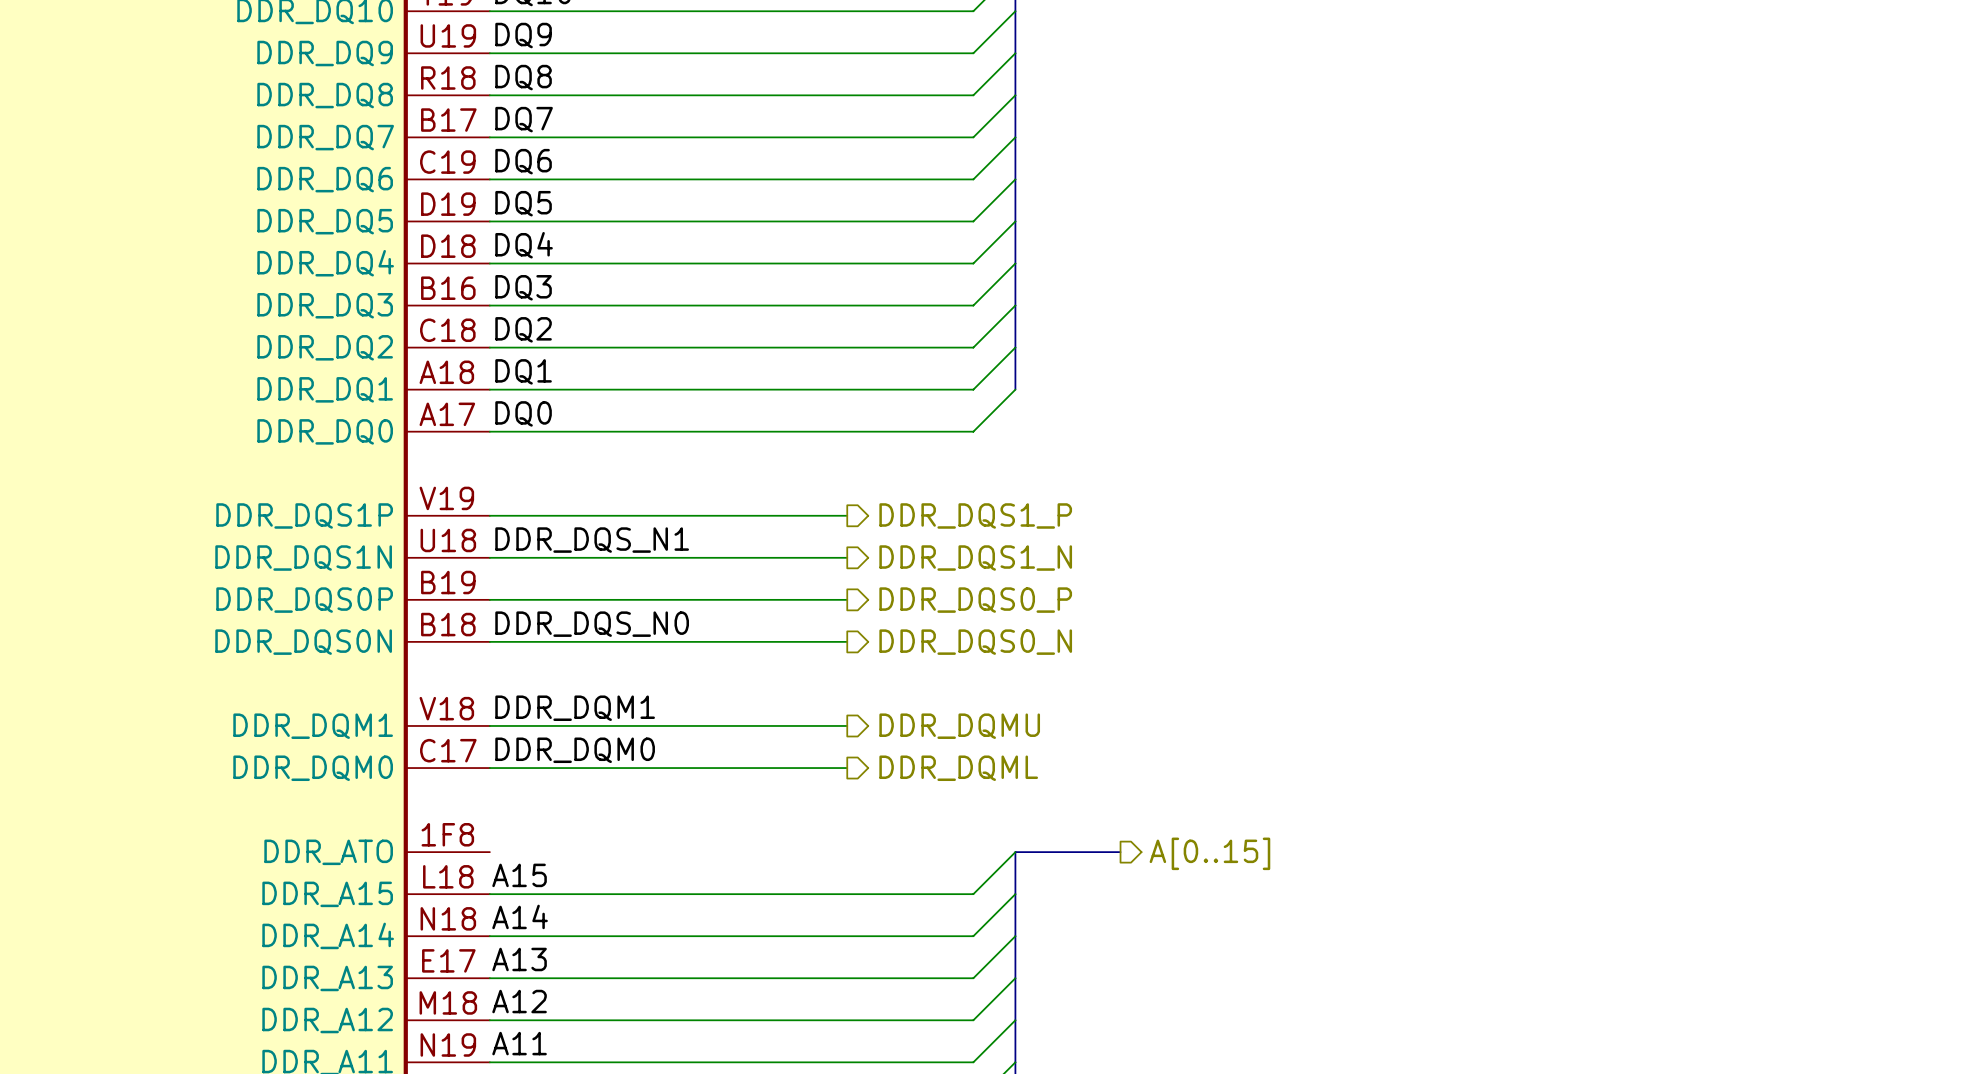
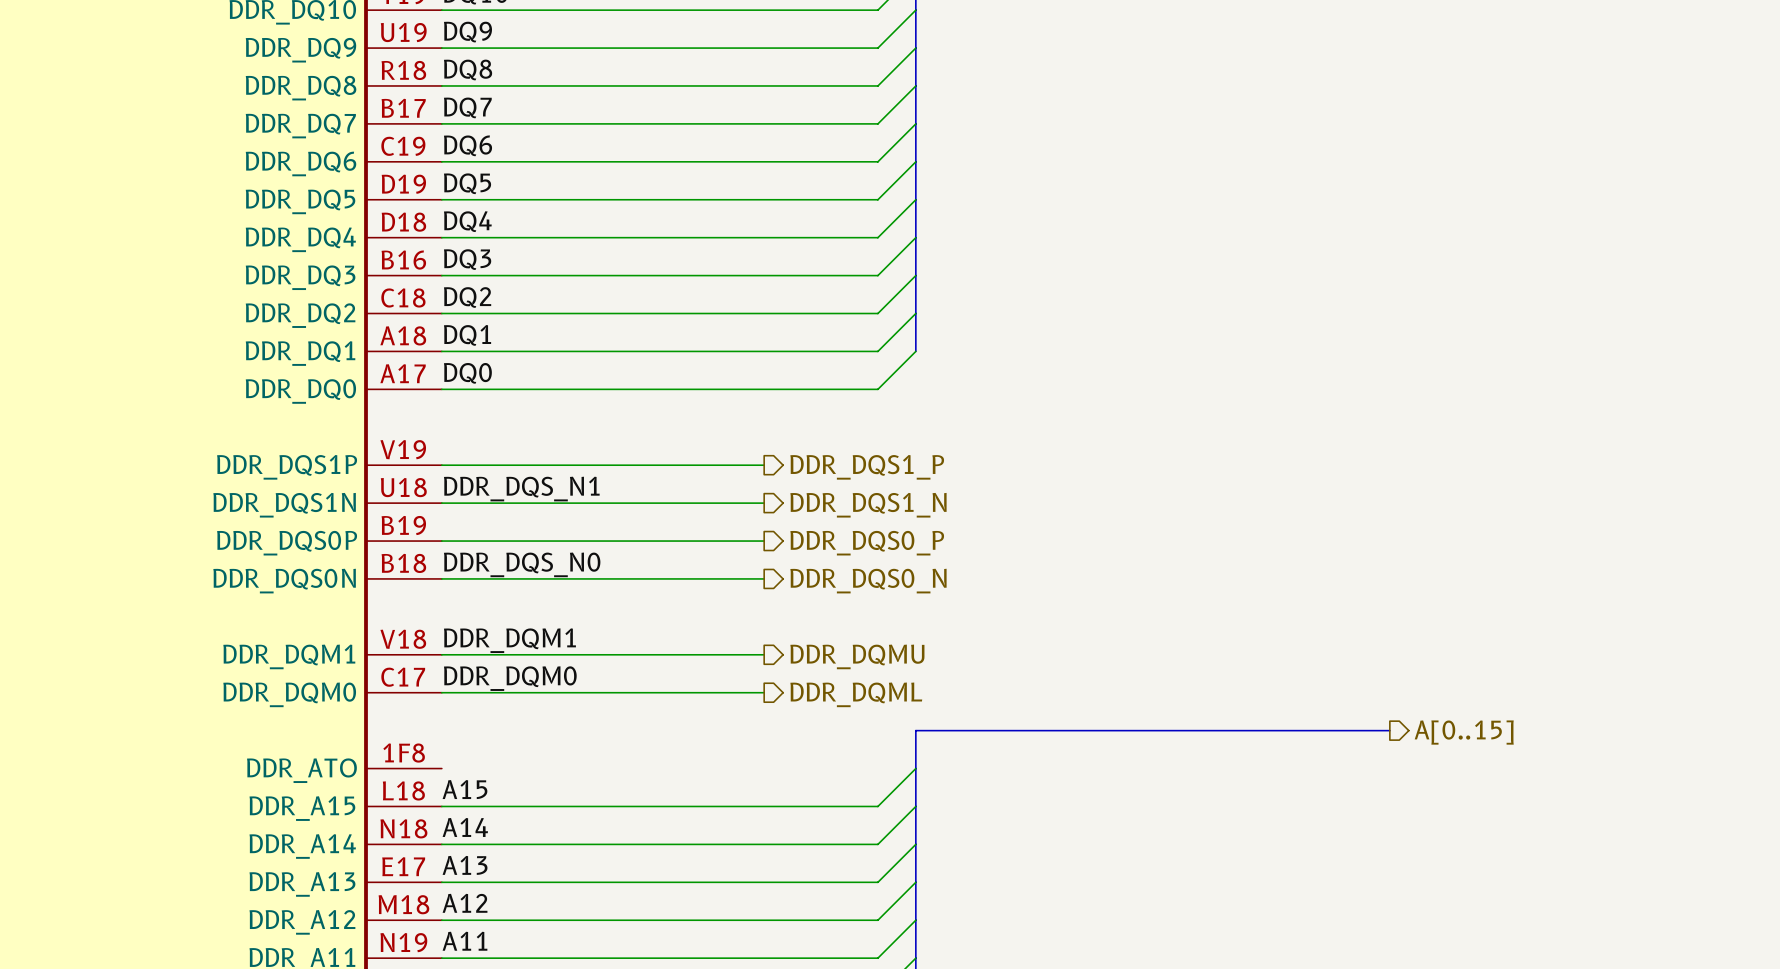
hierarchical label: none -> A[0..15] (1464, 732)
bus: (1015, 852) (1120, 852) -> (915, 768) (915, 730) (1389, 730)
hierarchical label: A[0..15] (1209, 853) -> none

